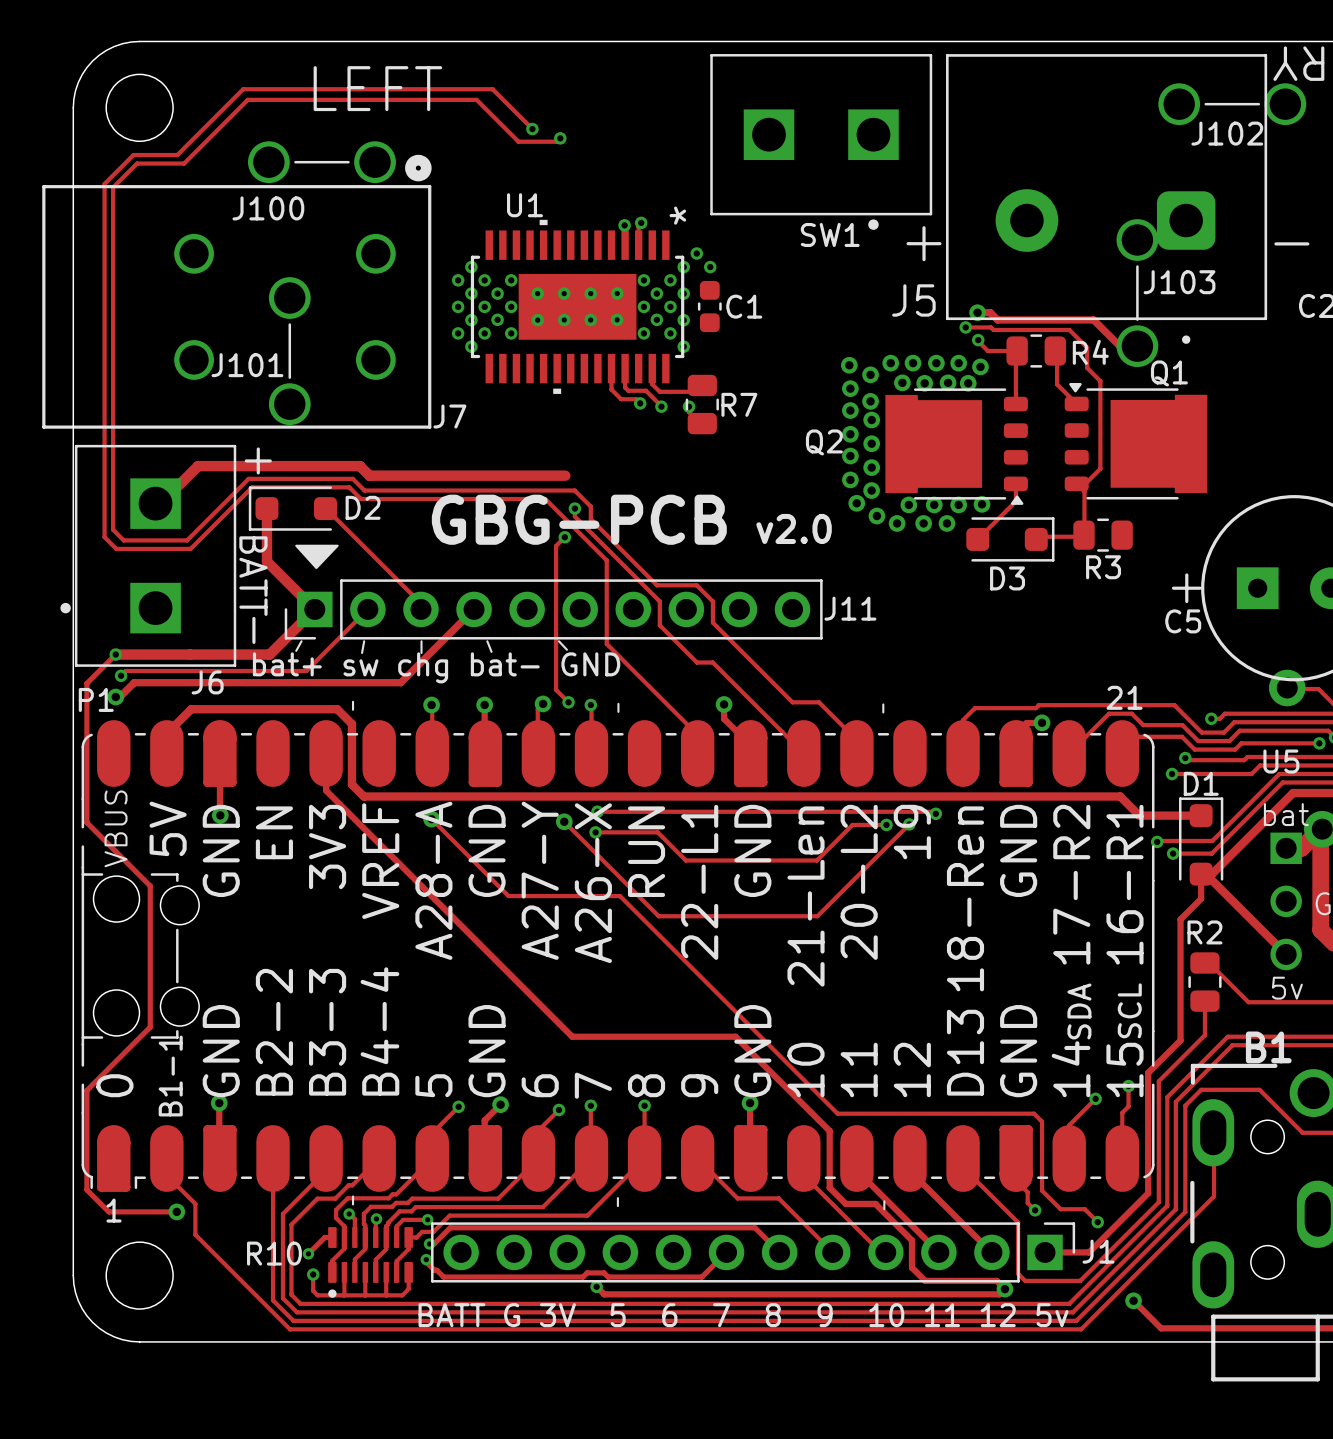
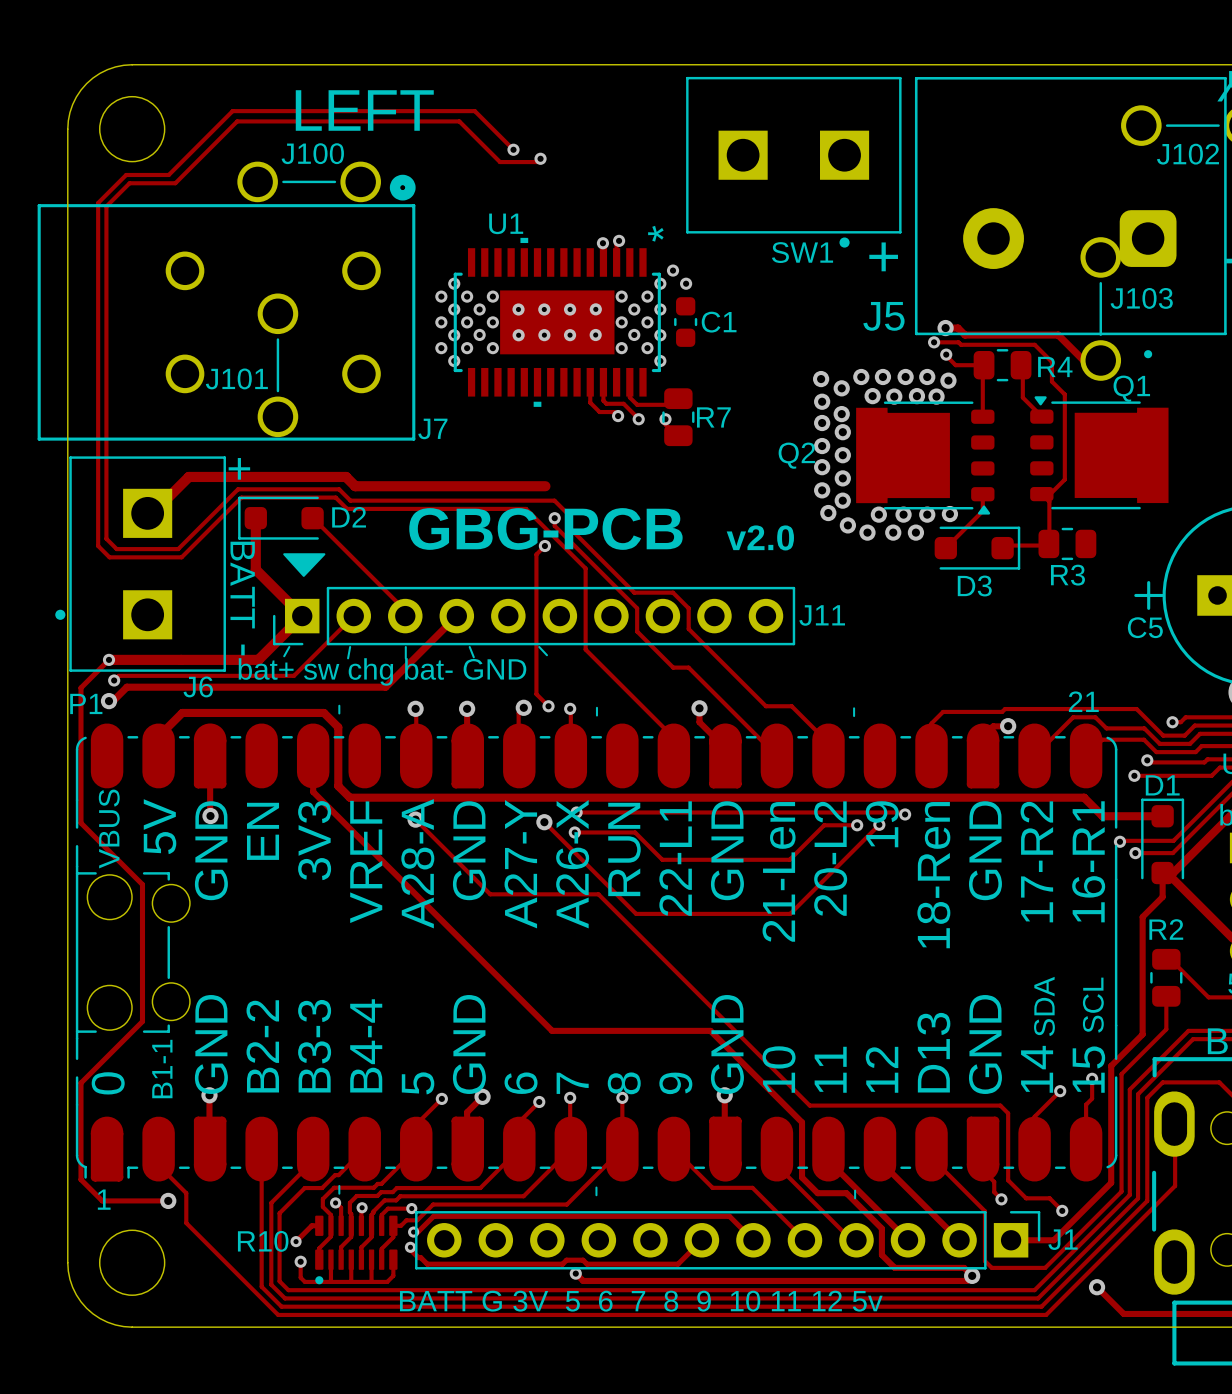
J100 name position: J100 (268, 208) -> J100 (312, 153)

